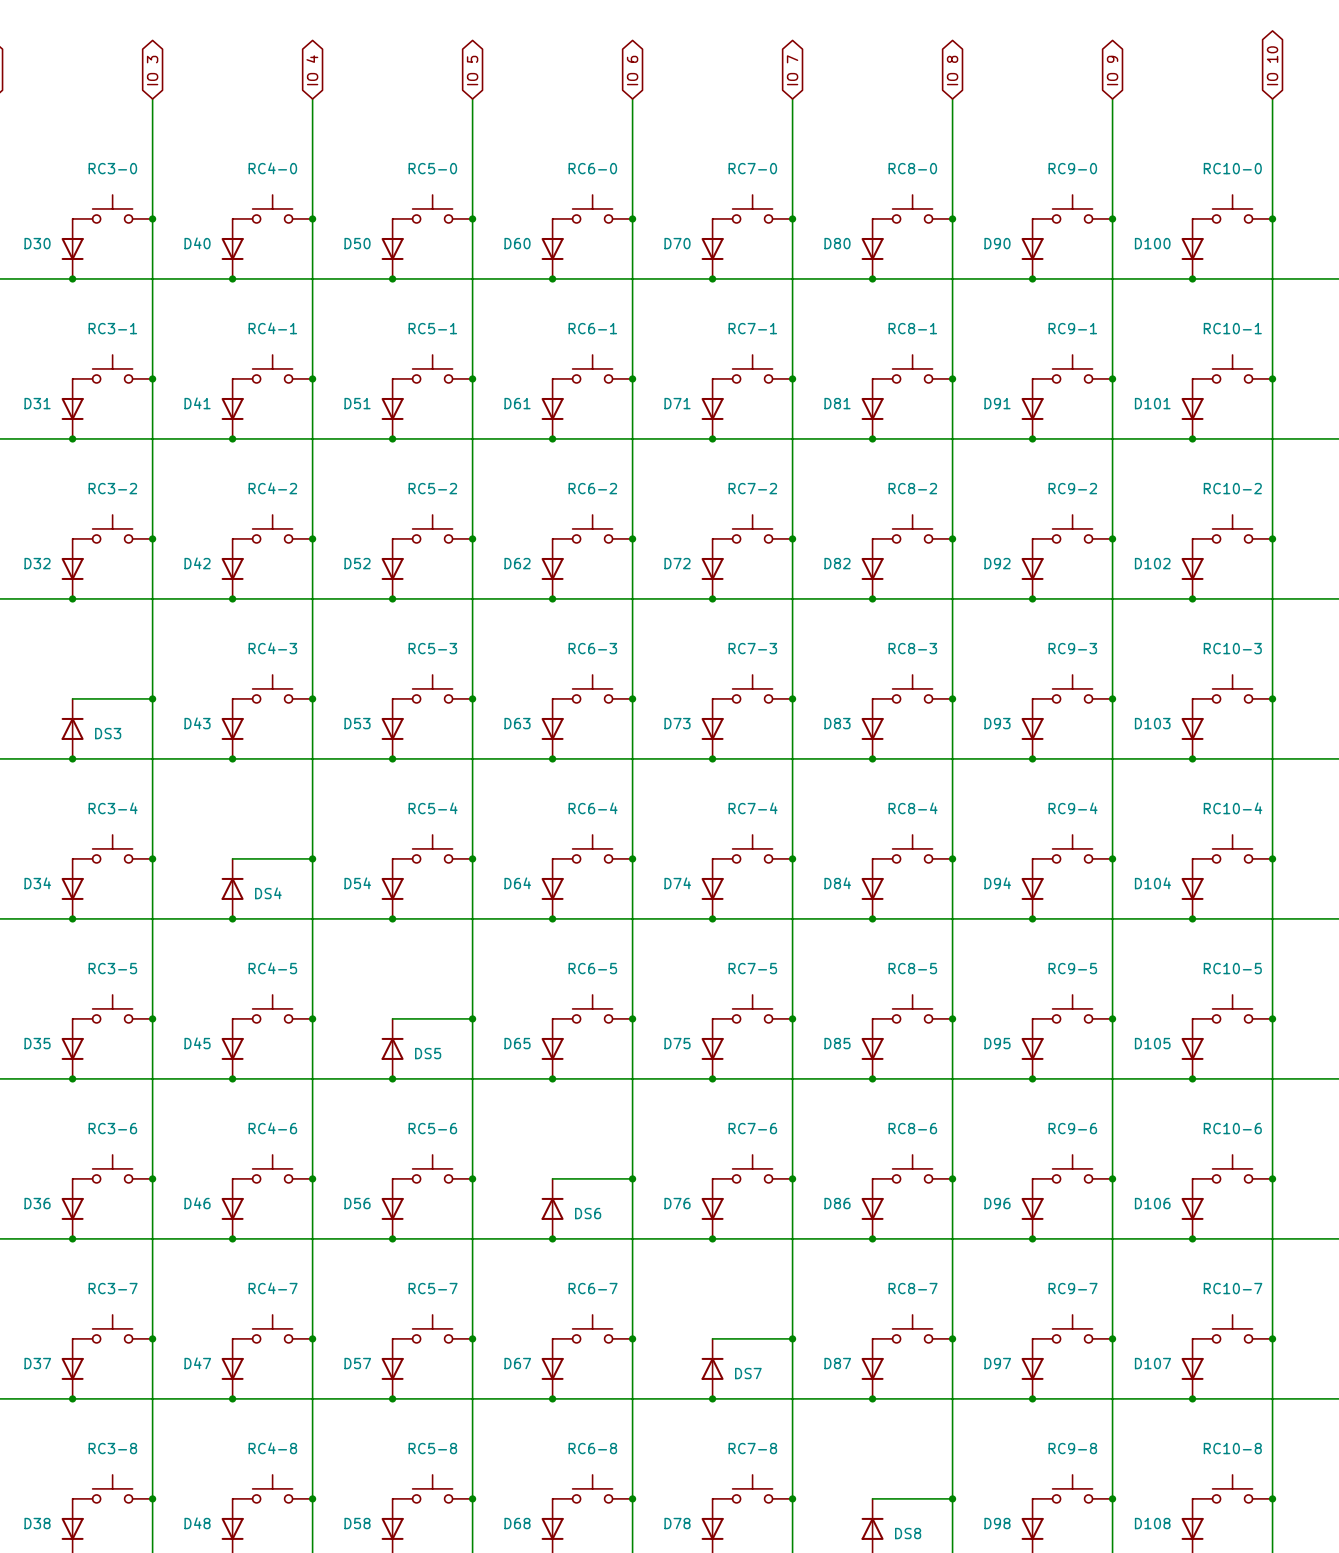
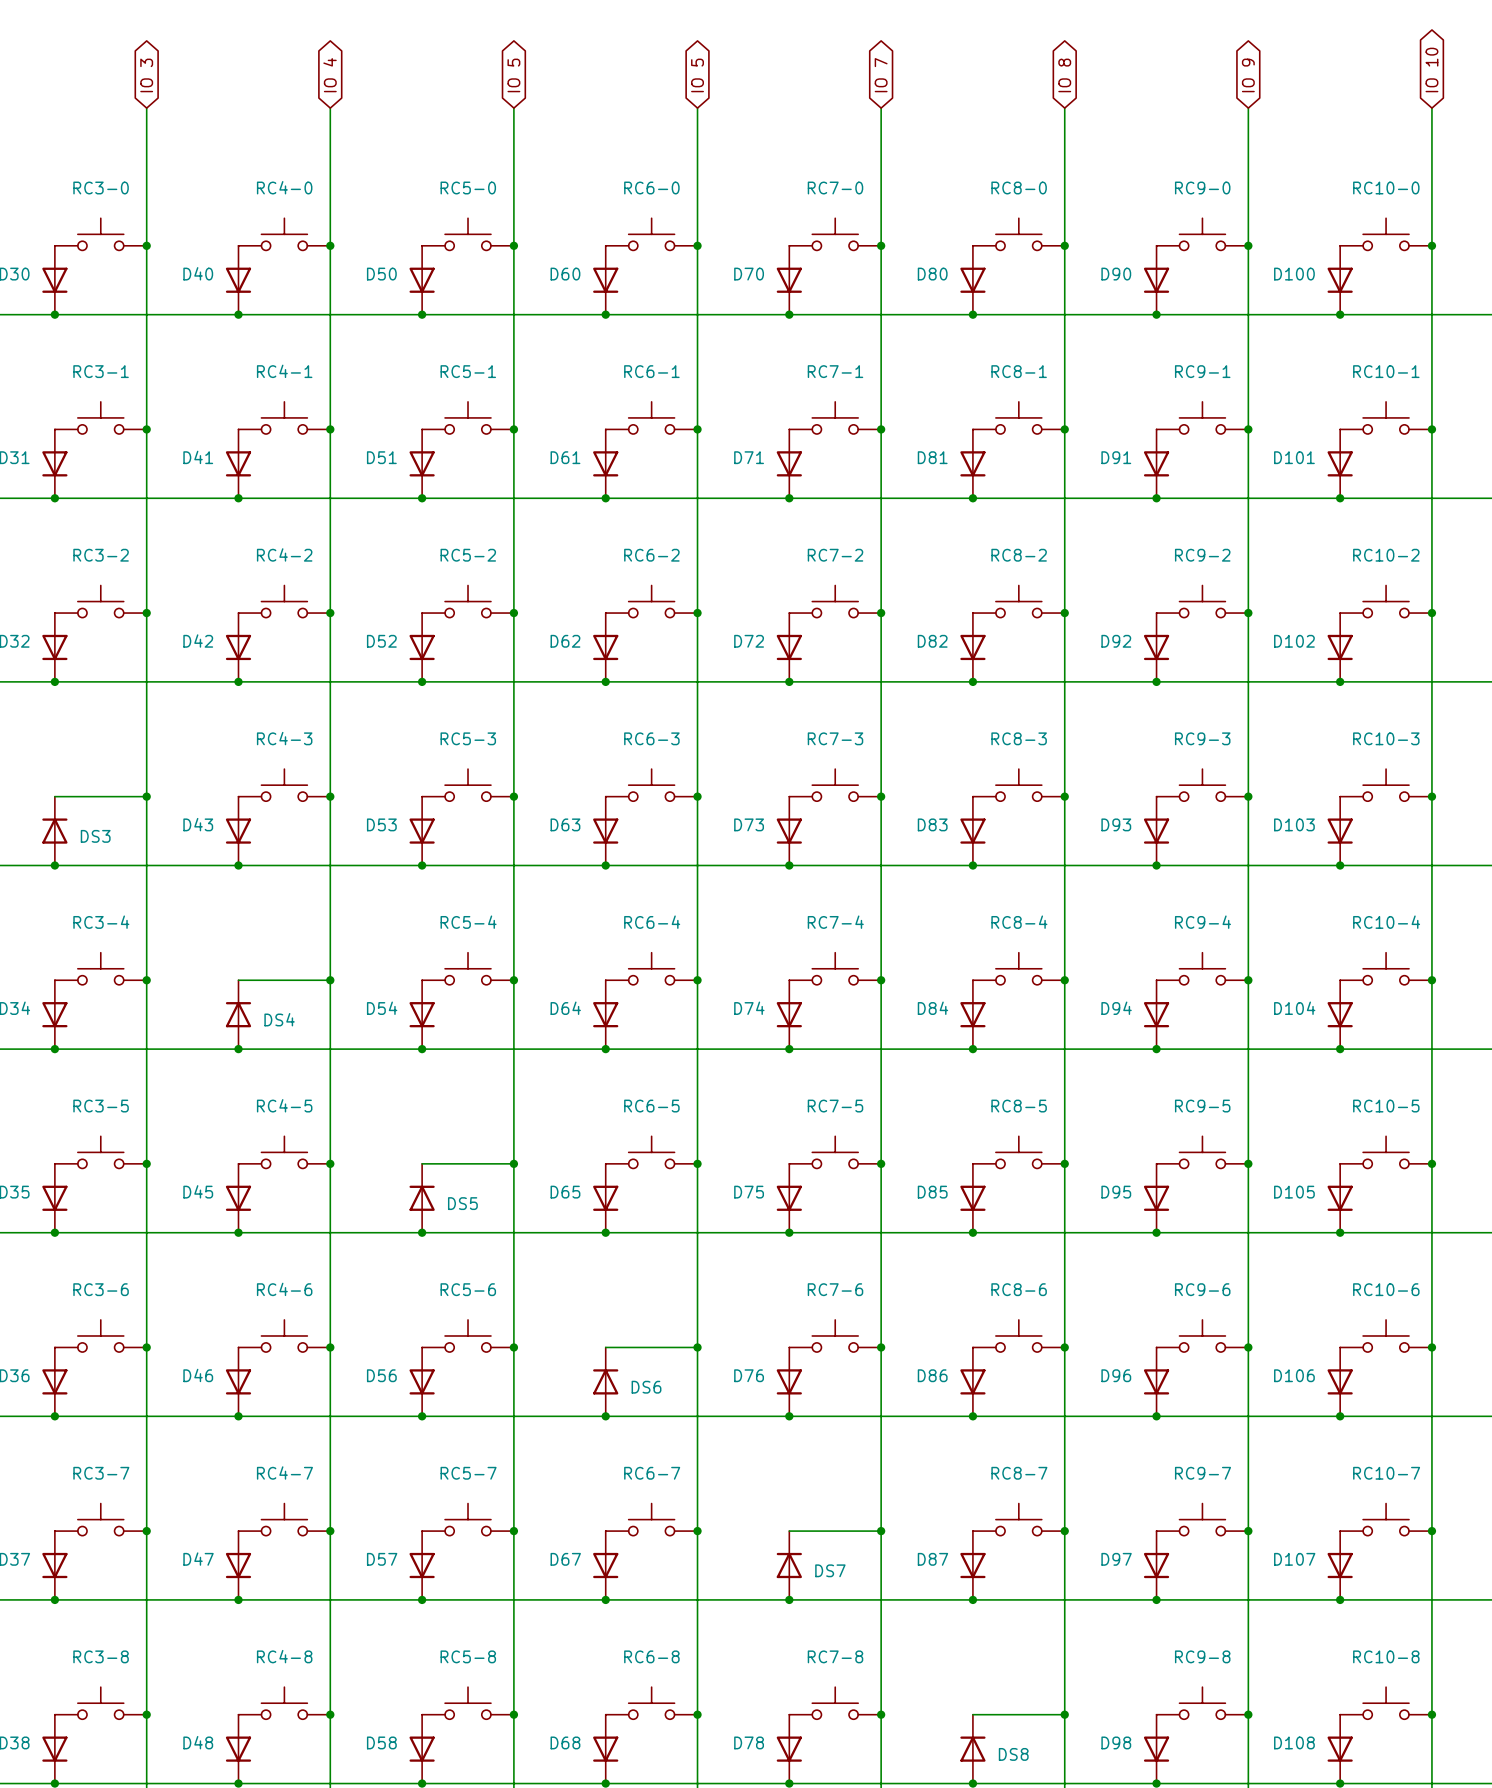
global label: IO 6 (632, 70) -> IO 5 (697, 75)

